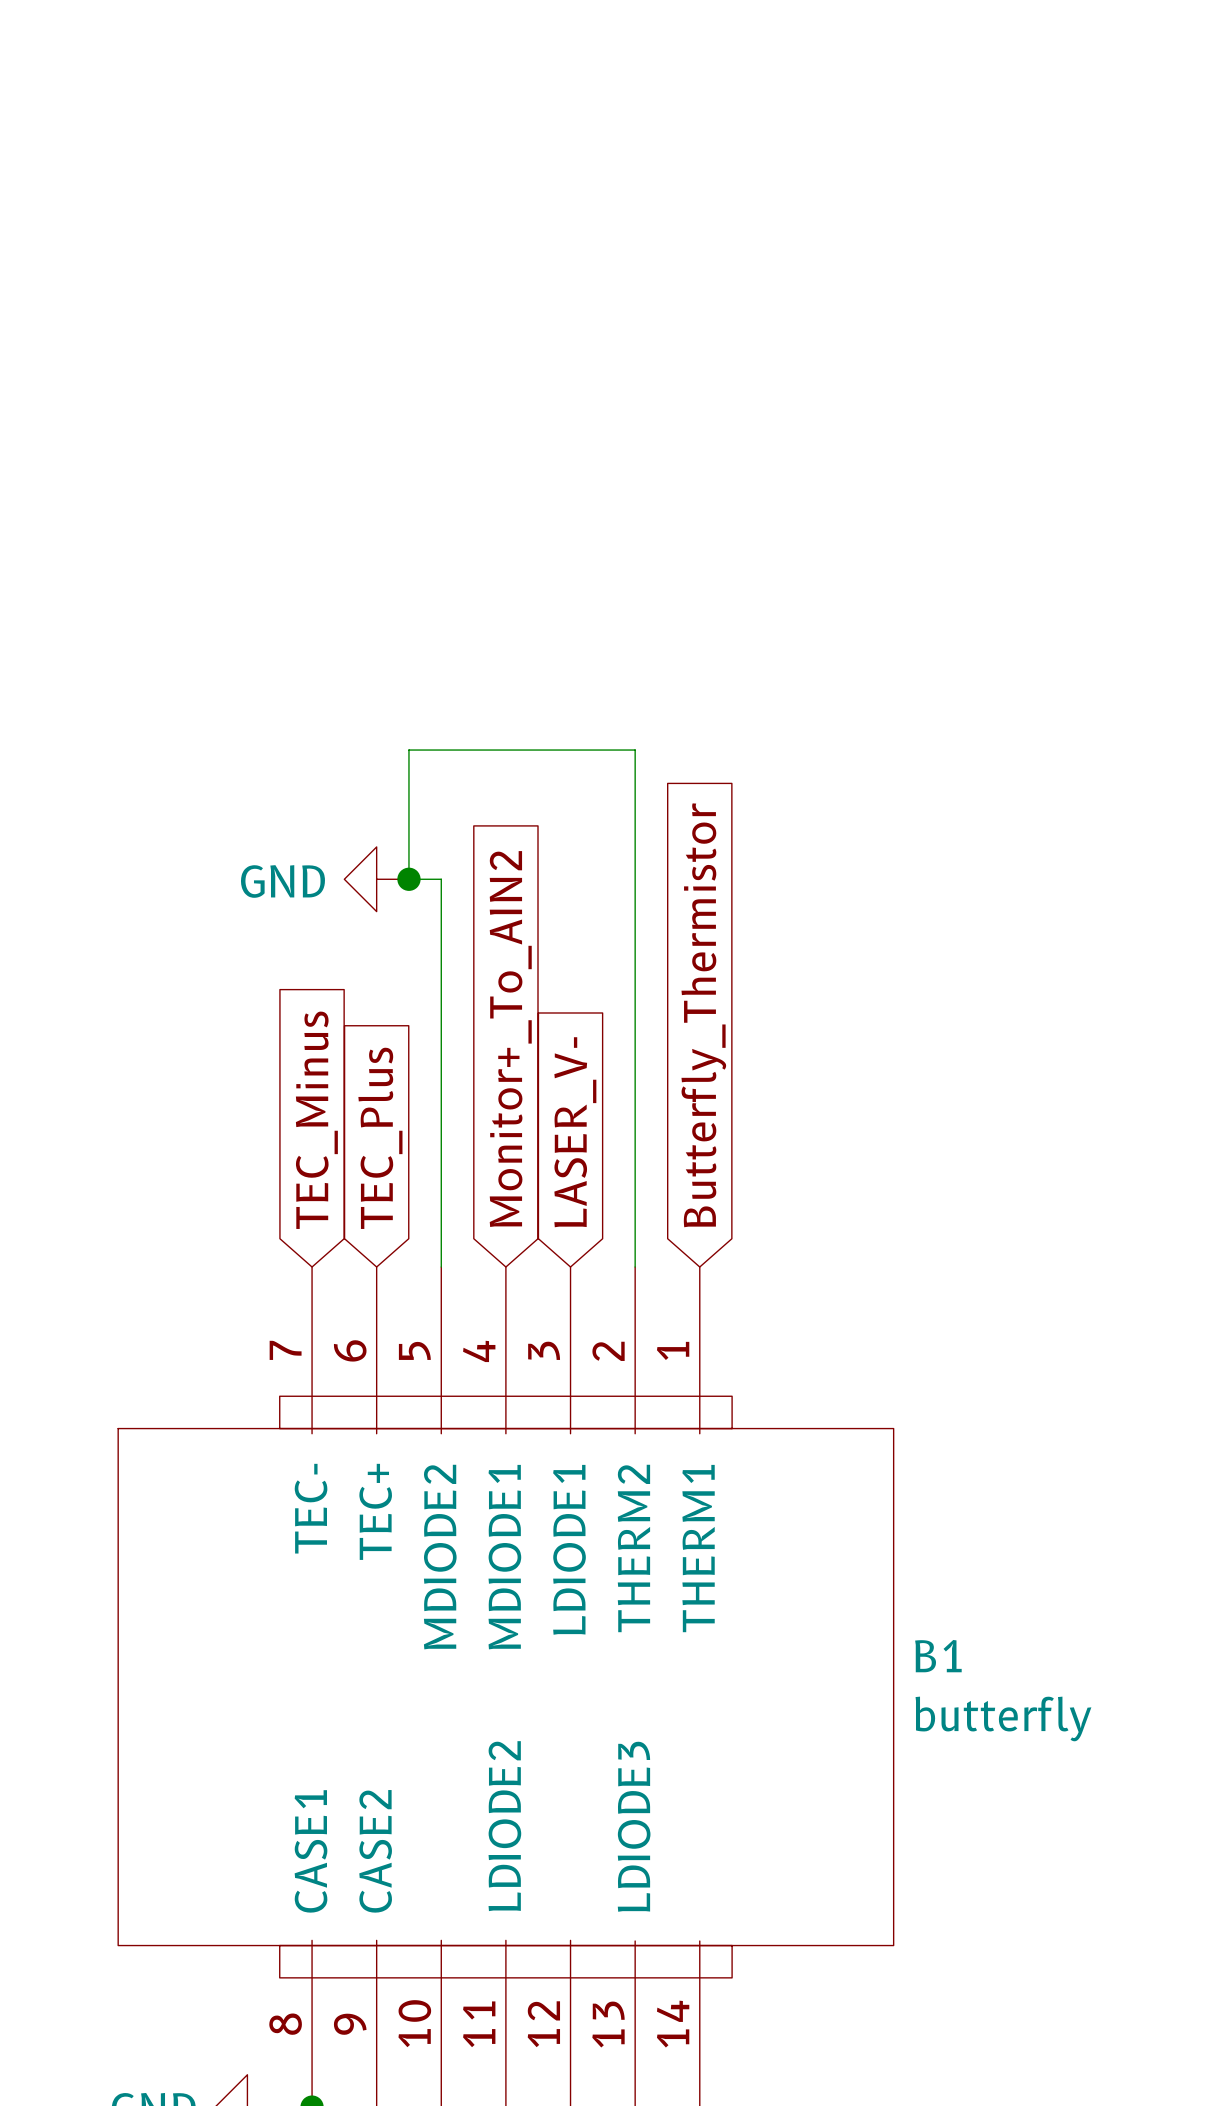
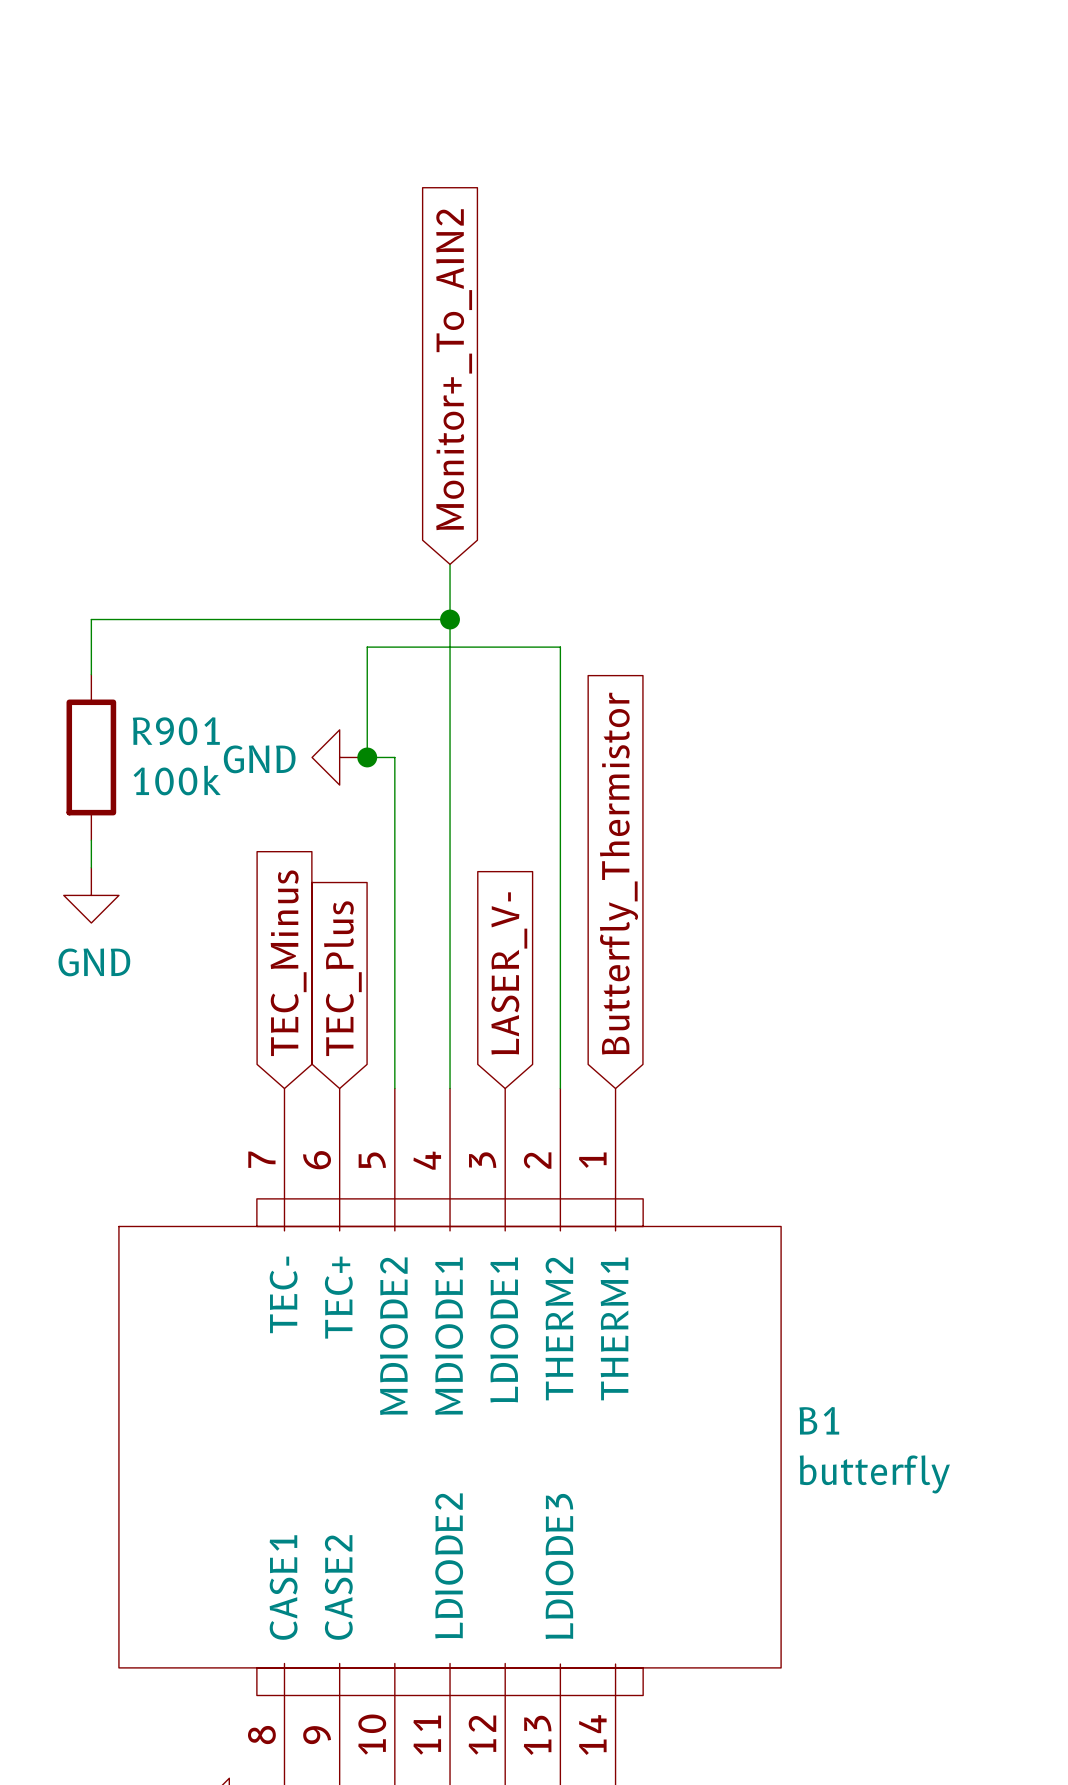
wire: none -> (450, 564) (450, 1088)
wire: none -> (450, 619) (91, 619) (91, 674)
junction: none -> (450, 619)
R901: none -> 100k (91, 757)
wire: none -> (91, 840) (91, 867)
global label position: Monitor+_To_AIN2 (510, 1039) -> Monitor+_To_AIN2 (454, 369)
power symbol: none -> GND (91, 895)

